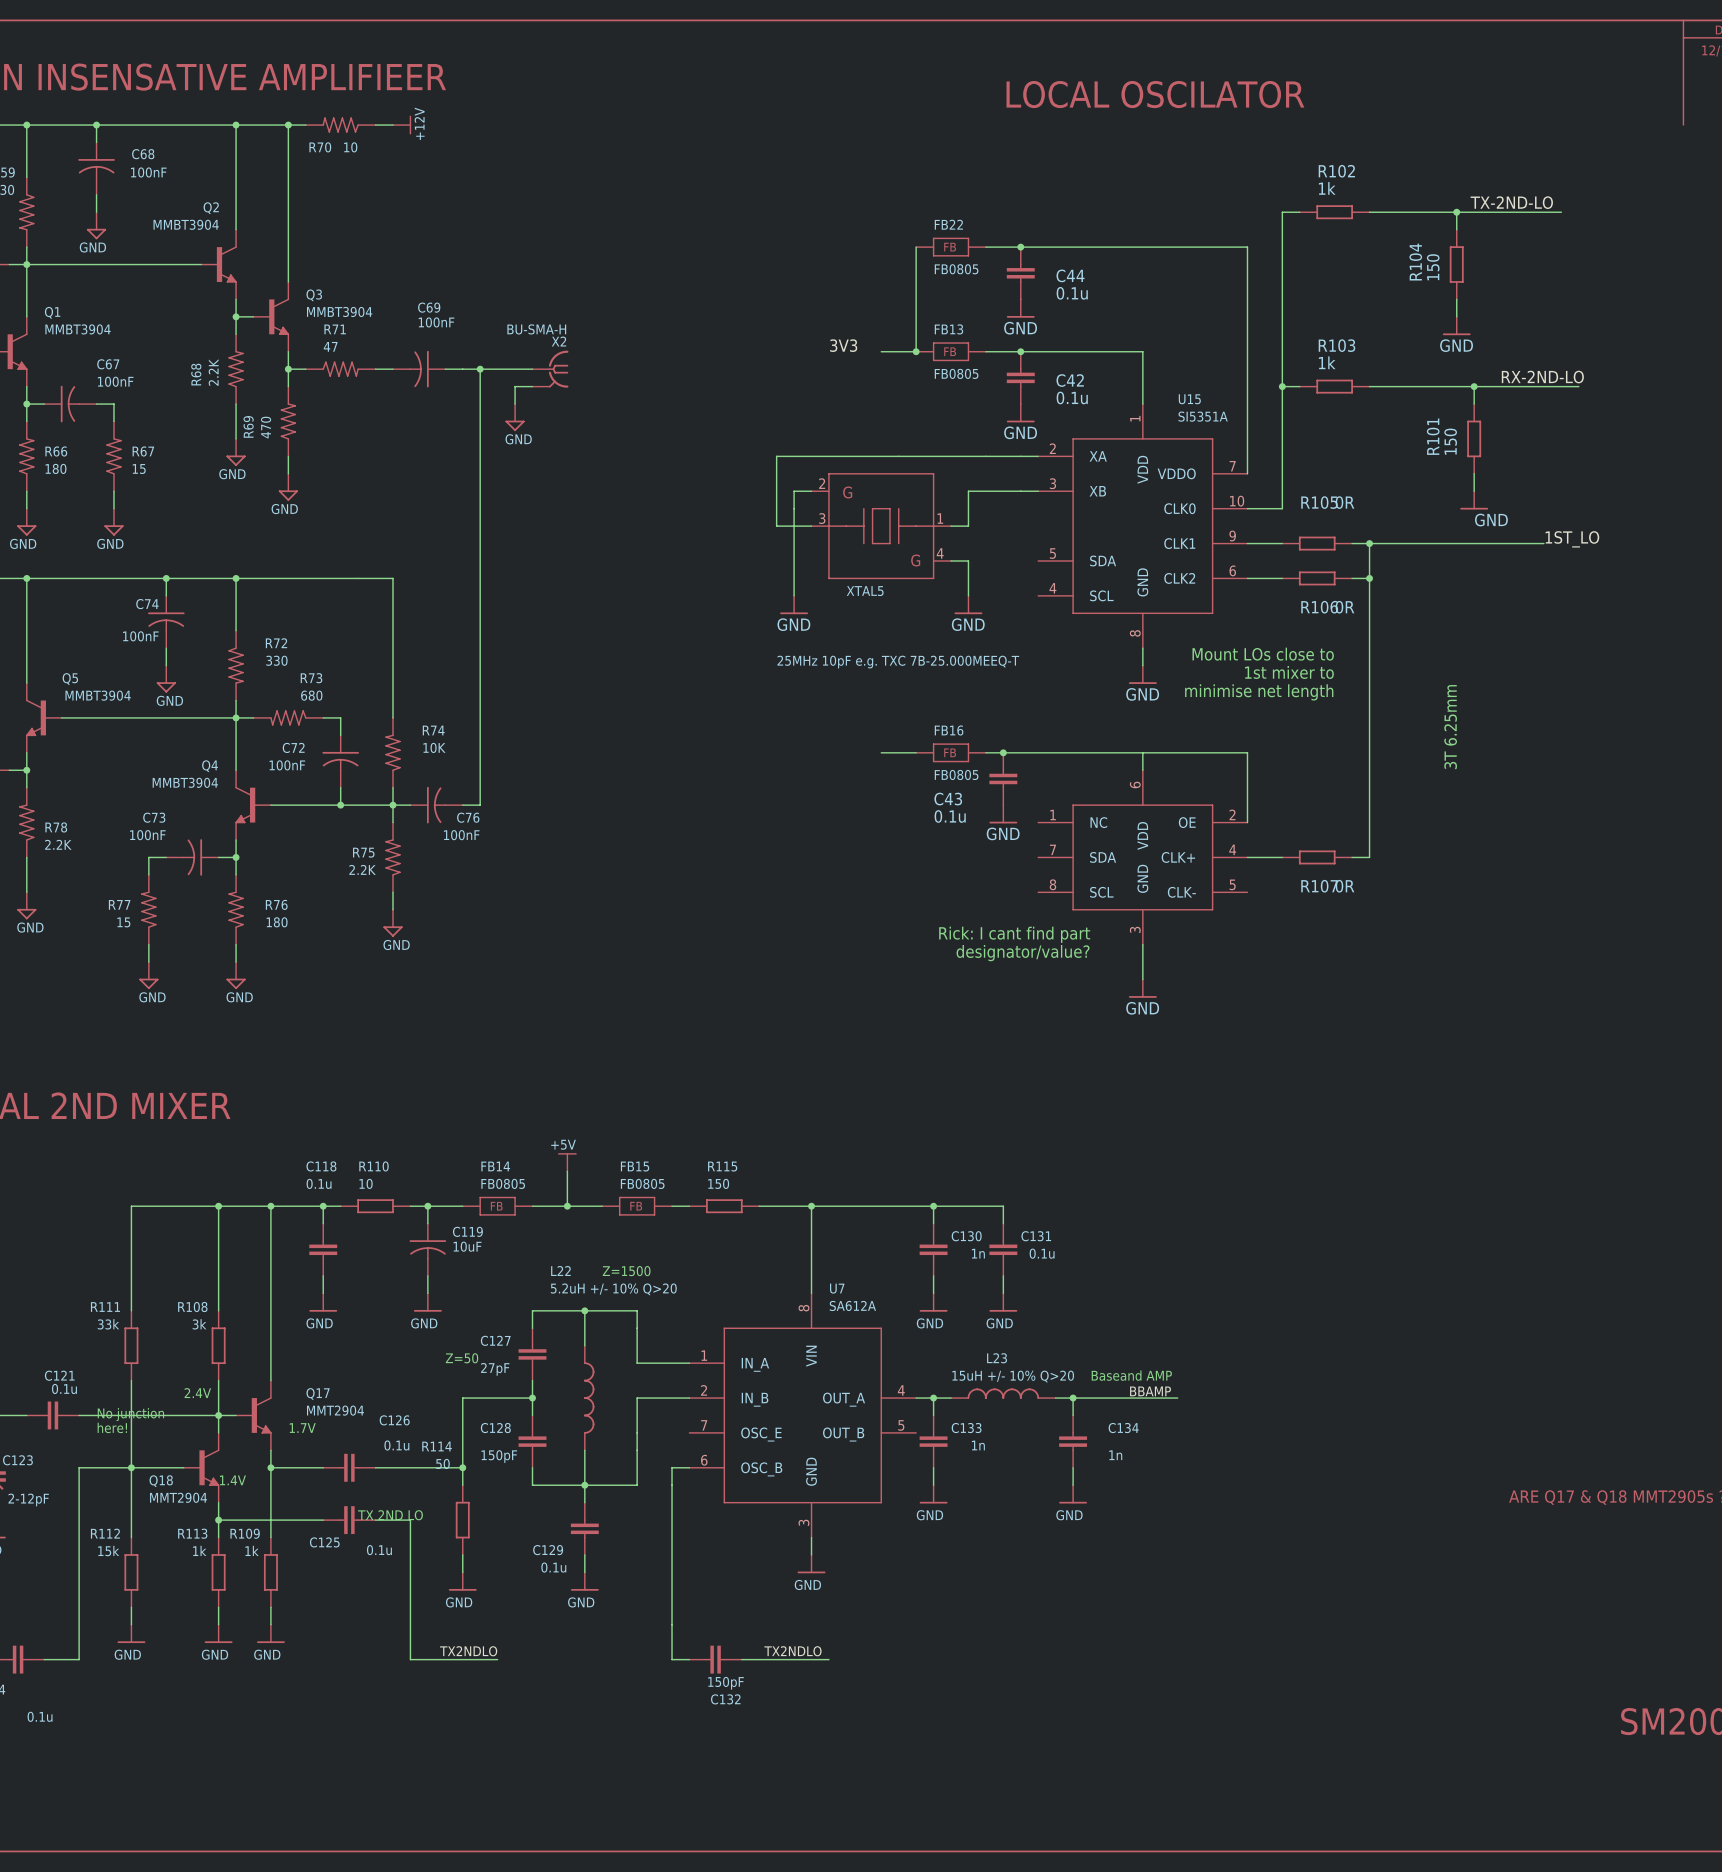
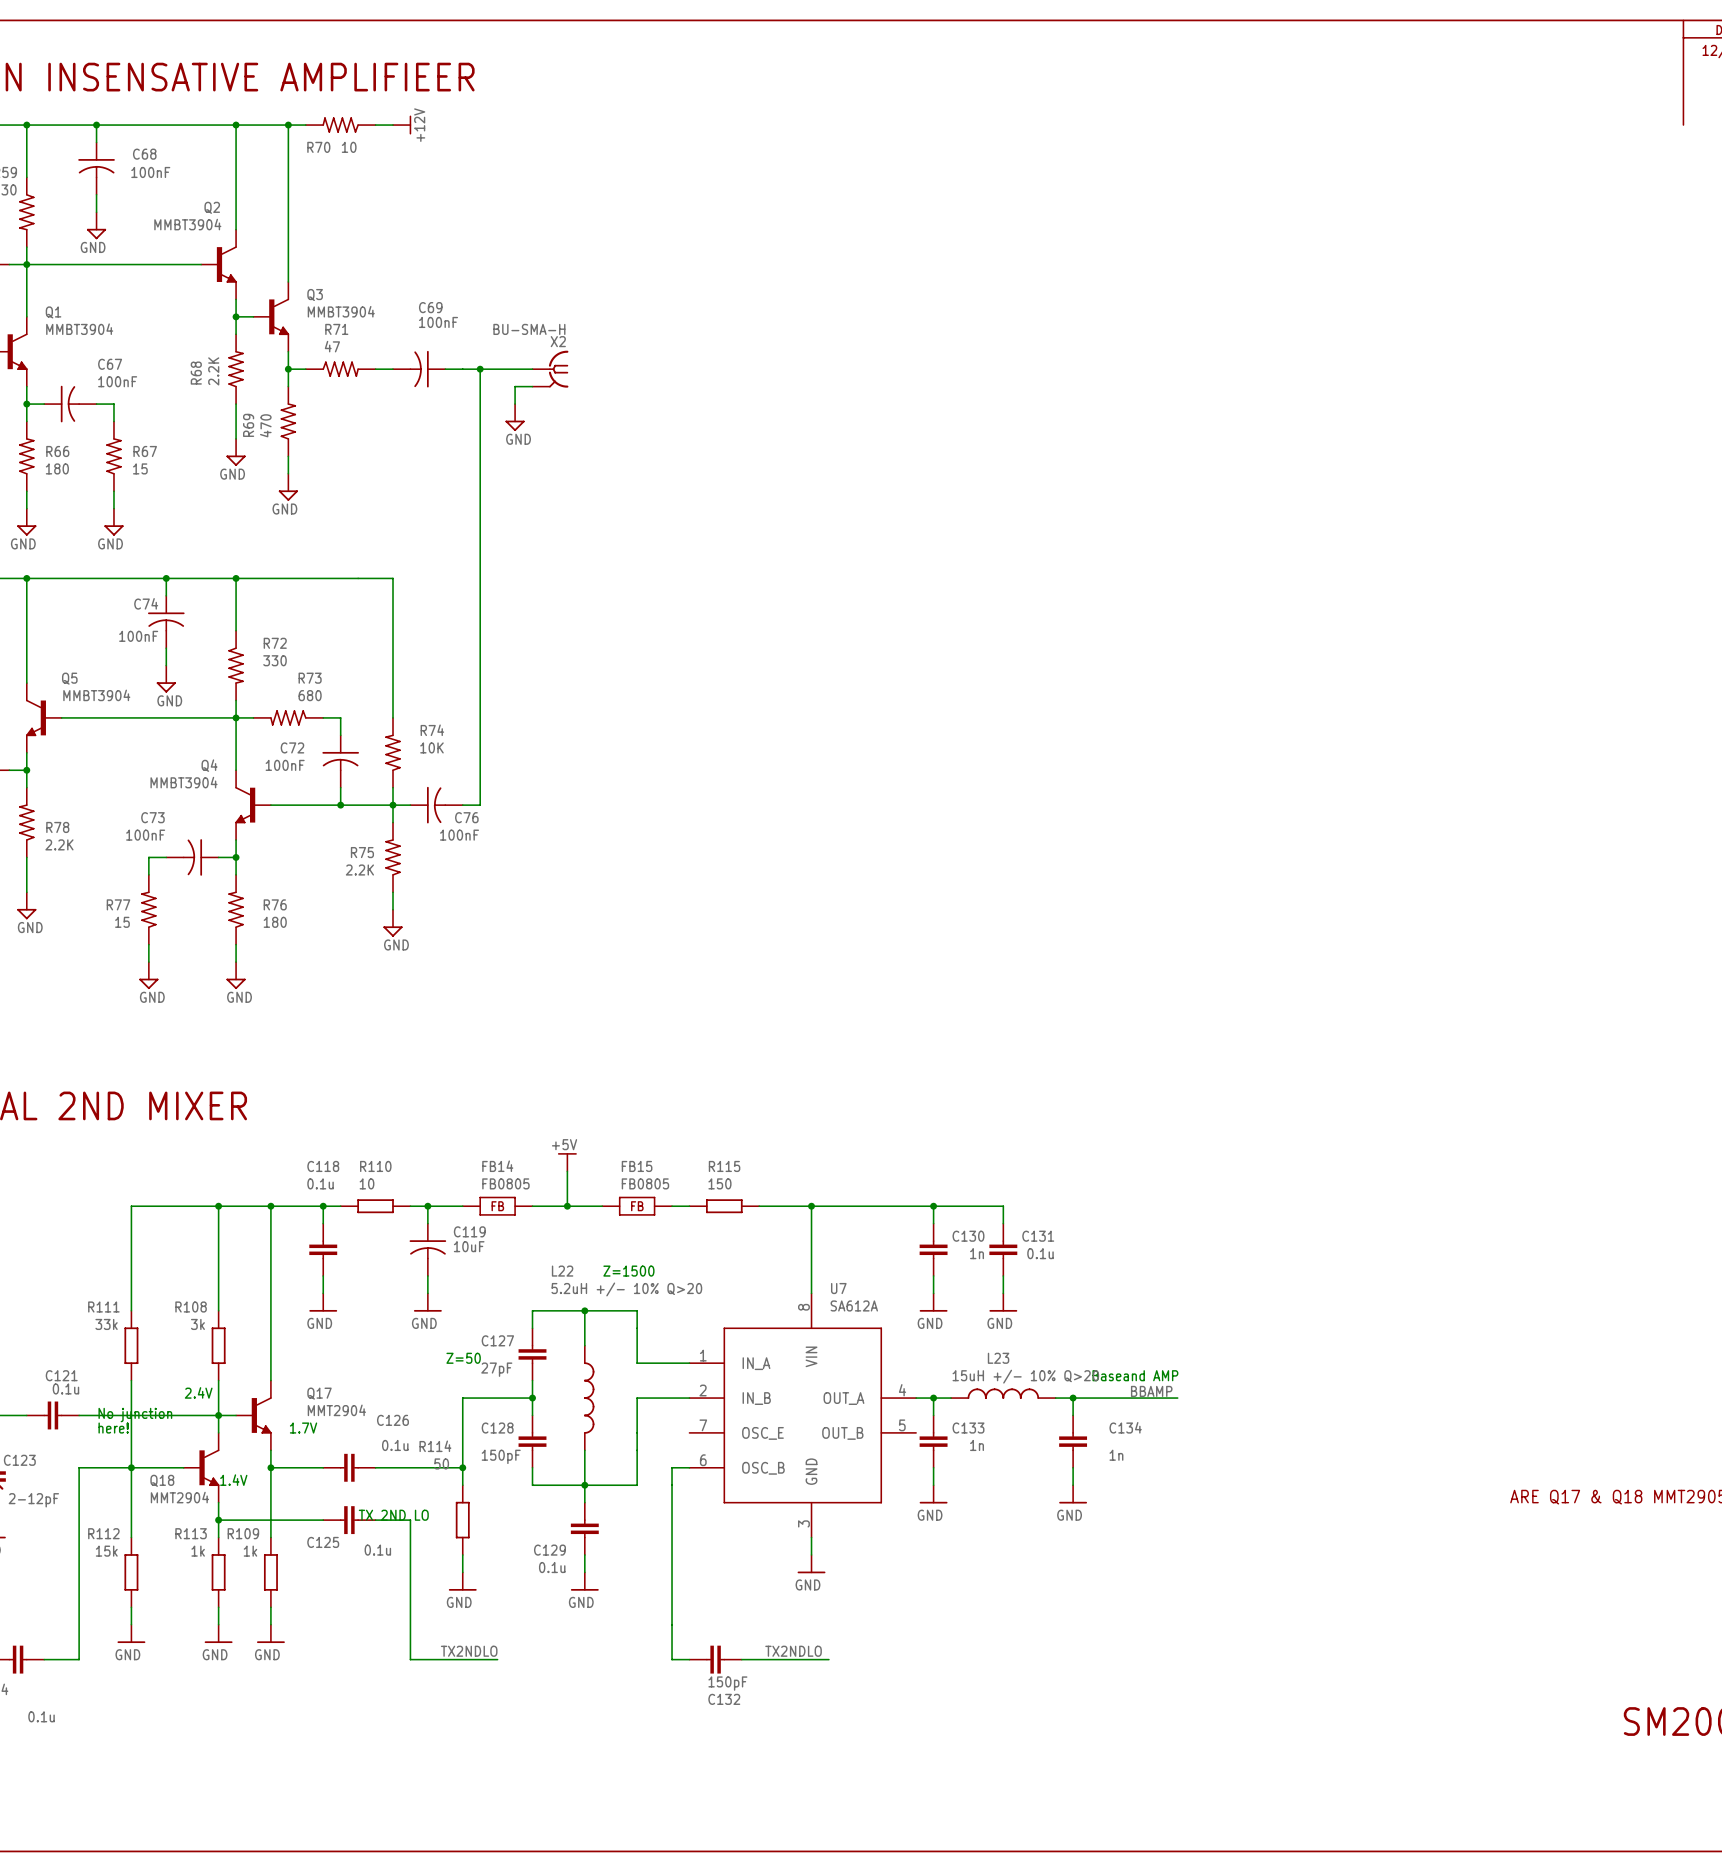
text: LOCAL OSCILATOR (1155, 94) -> none
label: TX-2ND-LO (1511, 202) -> none
wire: (1299, 212) (1282, 212) (1282, 508) (1247, 508) -> none
R102: 1k (1334, 212) -> none
wire: (1369, 212) (1561, 212) -> none
wire: (1456, 212) (1456, 229) -> none
junction: (1456, 212) -> none
wire: (916, 247) (916, 351) (881, 351) -> none
FB22: FB0805 (951, 247) -> none
wire: (985, 247) (1247, 247) (1247, 473) -> none
junction: (1020, 247) -> none
R104: 150 (1456, 264) -> none
C44: 0.1u (1020, 273) -> none
wire: (1456, 299) (1456, 316) -> none
power symbol: GND (1020, 308) -> none
power symbol: GND (1456, 326) -> none
label: 3V3 (843, 345) -> none
junction: (916, 351) -> none
FB13: FB0805 (951, 351) -> none
wire: (985, 351) (1142, 351) (1142, 404) -> none
junction: (1020, 351) -> none
C42: 0.1u (1020, 377) -> none
label: RX-2ND-LO (1542, 377) -> none
wire: (1282, 386) (1299, 386) -> none
junction: (1282, 386) -> none
R103: 1k (1334, 386) -> none
wire: (1369, 386) (1578, 386) -> none
wire: (1474, 386) (1474, 404) -> none
junction: (1474, 386) -> none
power symbol: GND (1020, 413) -> none
R101: 150 (1474, 438) -> none
wire: (1038, 456) (776, 456) (776, 526) (811, 526) -> none
wire: (1474, 473) (1474, 491) -> none
wire: (811, 491) (794, 491) (794, 595) -> none
wire: (1038, 491) (968, 491) (968, 526) (951, 526) -> none
power symbol: GND (1474, 500) -> none
XTAL5: 25MHz 10pF e.g. TXC 7B-25.000MEEQ-T (881, 526) -> none
U15: SI5351A (1142, 526) -> none
label: 1ST_LO (1572, 539) -> none
wire: (1247, 543) (1282, 543) -> none
R105: 0R (1317, 543) -> none
wire: (1352, 543) (1543, 543) -> none
wire: (1369, 543) (1369, 857) (1352, 857) -> none
junction: (1369, 543) -> none
wire: (951, 561) (968, 561) (968, 595) -> none
wire: (1247, 578) (1282, 578) -> none
R106: 0R (1317, 578) -> none
wire: (1352, 578) (1369, 578) -> none
junction: (1369, 578) -> none
power symbol: GND (794, 605) -> none
power symbol: GND (968, 605) -> none
wire: (1142, 648) (1142, 665) -> none
text: Mount LOs close to (1263, 654) -> none
text: 1st mixer to (1289, 672) -> none
power symbol: GND (1142, 674) -> none
text: minimise net length (1259, 692) -> none
text: 3T 6.25mm (1450, 727) -> none
wire: (881, 752) (916, 752) -> none
FB16: FB0805 (951, 752) -> none
wire: (985, 752) (1247, 752) (1247, 822) -> none
junction: (1003, 752) -> none
wire: (1142, 752) (1142, 770) -> none
C43: 0.1u (1003, 778) -> none
power symbol: GND (1003, 814) -> none
part: (1142, 857) -> none
wire: (1247, 857) (1282, 857) -> none
R107: 0R (1317, 857) -> none
text: Rick: I cant find part (1014, 934) -> none
wire: (1142, 944) (1142, 979) -> none
text: designator/value? (1023, 953) -> none
power symbol: GND (1142, 988) -> none

